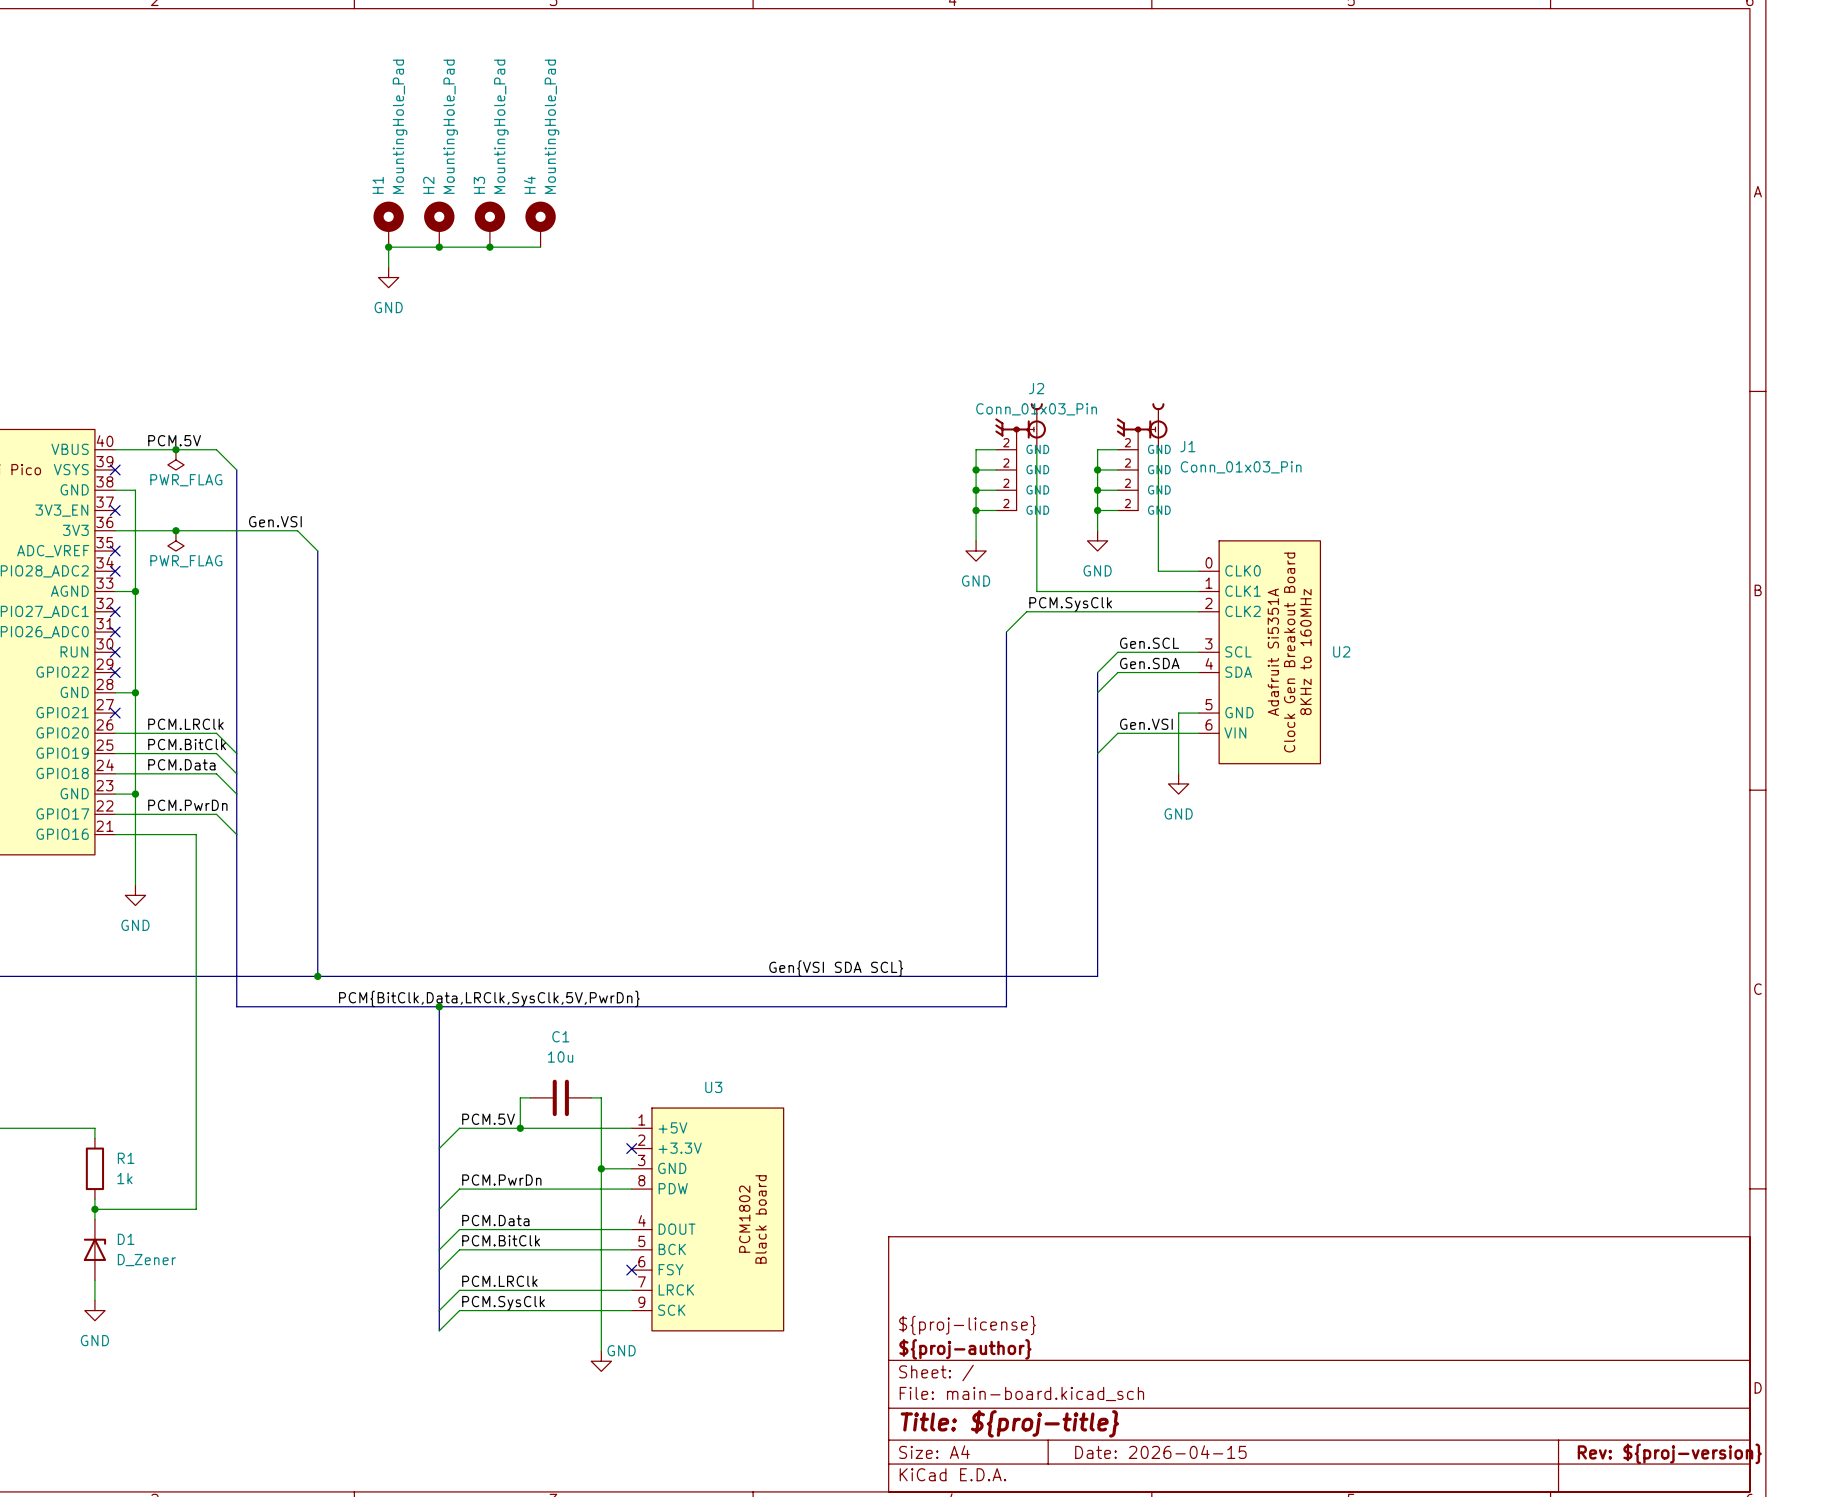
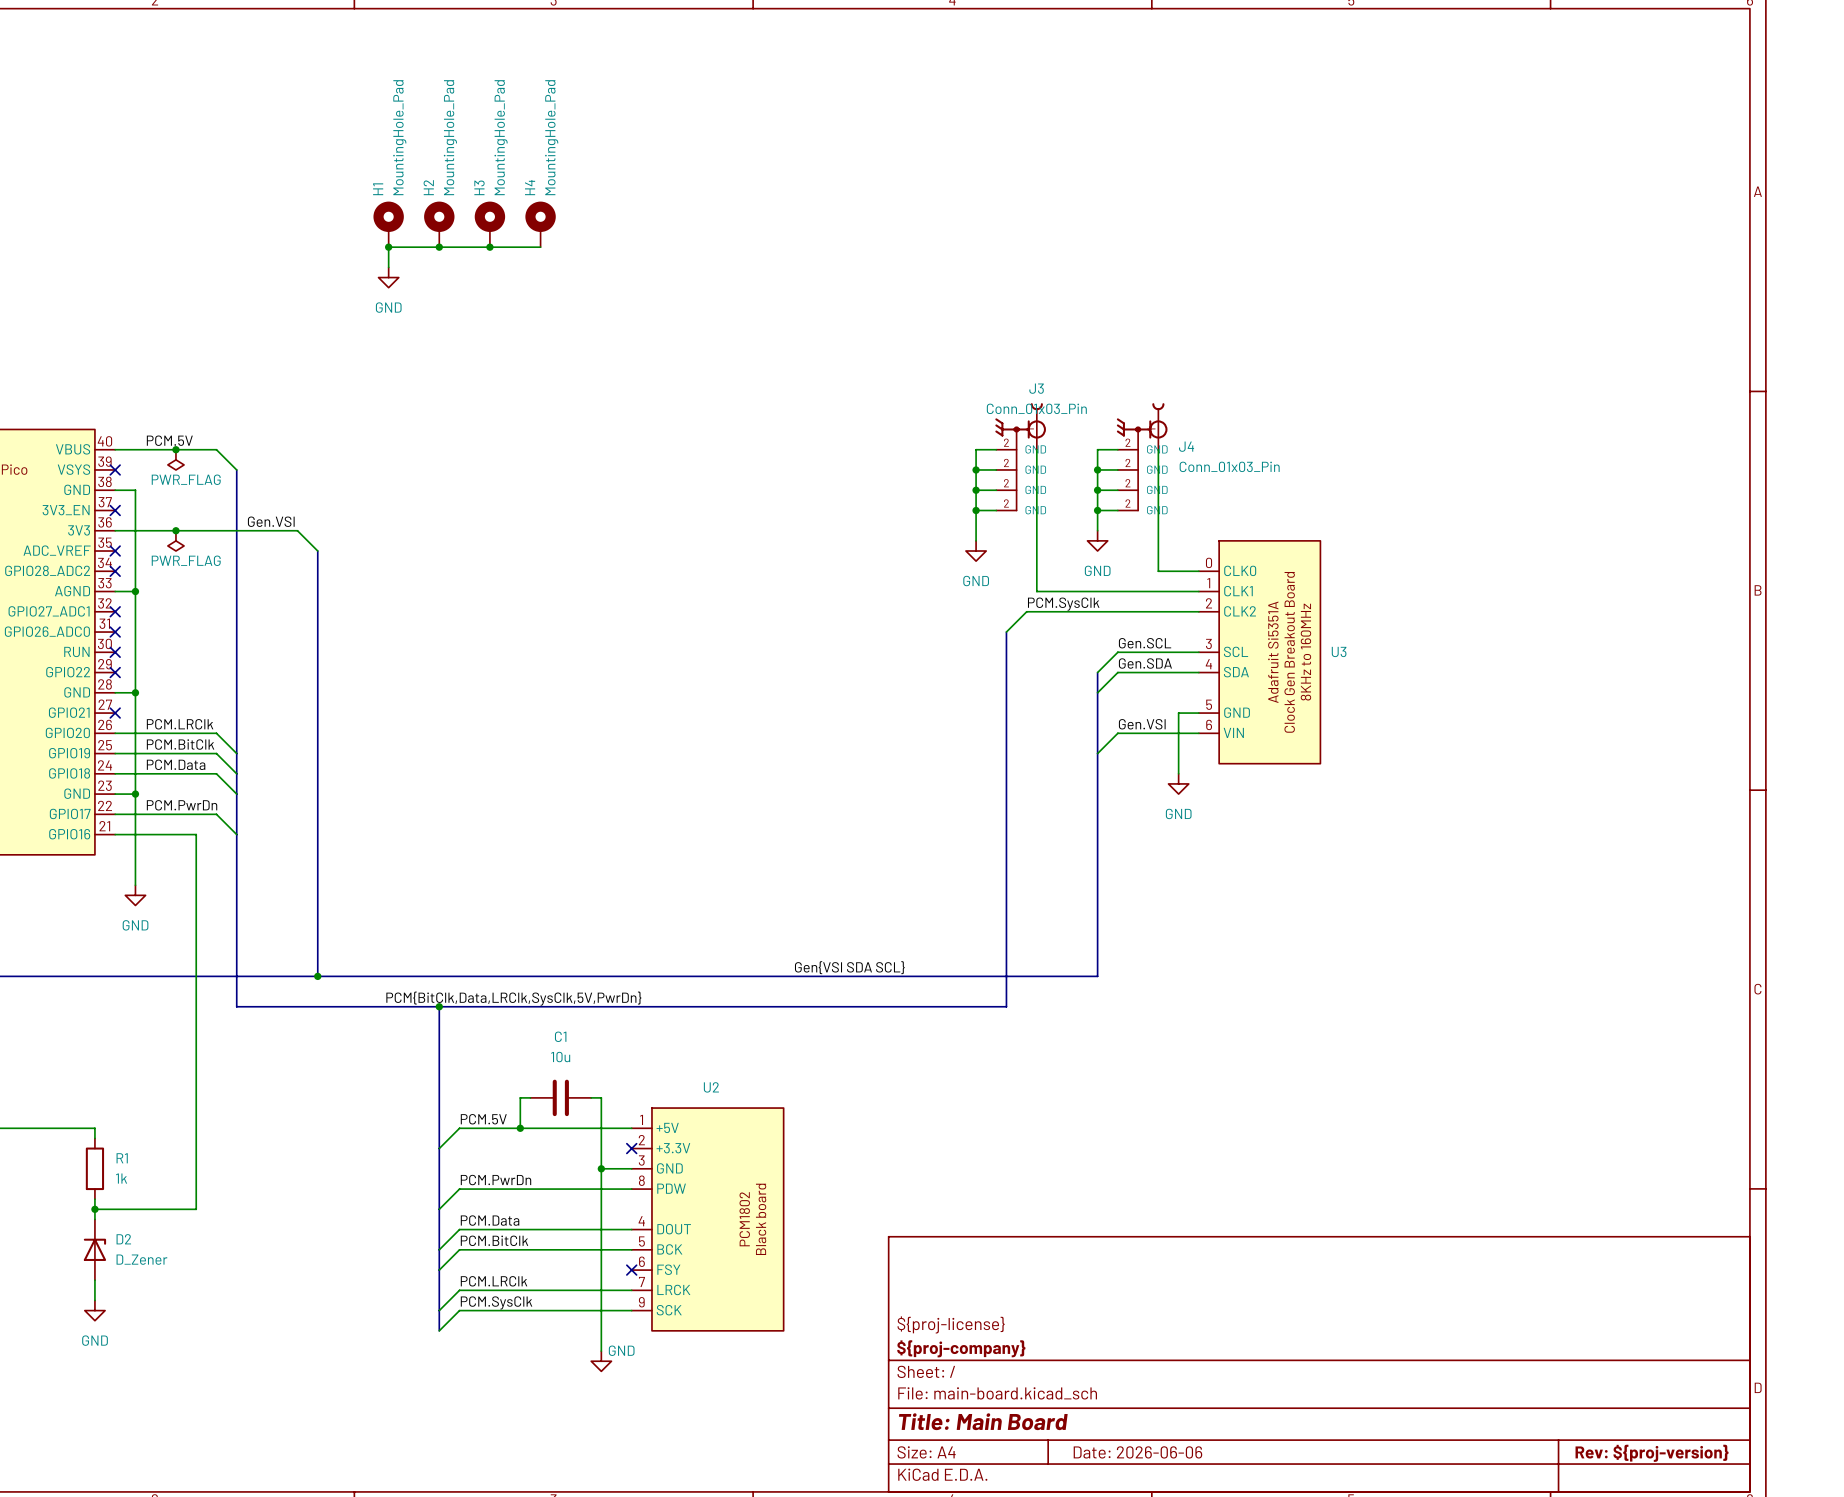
J2 name: J2 (1036, 388) -> J3 (1036, 388)
J1 name: J1 (1187, 446) -> J4 (1186, 446)
U2 name: U2 (1341, 651) -> U3 (1339, 651)
U3 name: U3 (713, 1087) -> U2 (711, 1087)
D1 name: D1 (126, 1239) -> D2 (123, 1239)
title block: ${proj-author} (965, 1349) -> ${proj-company} (961, 1348)
title block: Title: ${proj-title} (1009, 1423) -> Title: Main Board (983, 1421)
title block: Date: 2026-04-15 (1160, 1452) -> Date: 2026-06-06 (1137, 1452)

